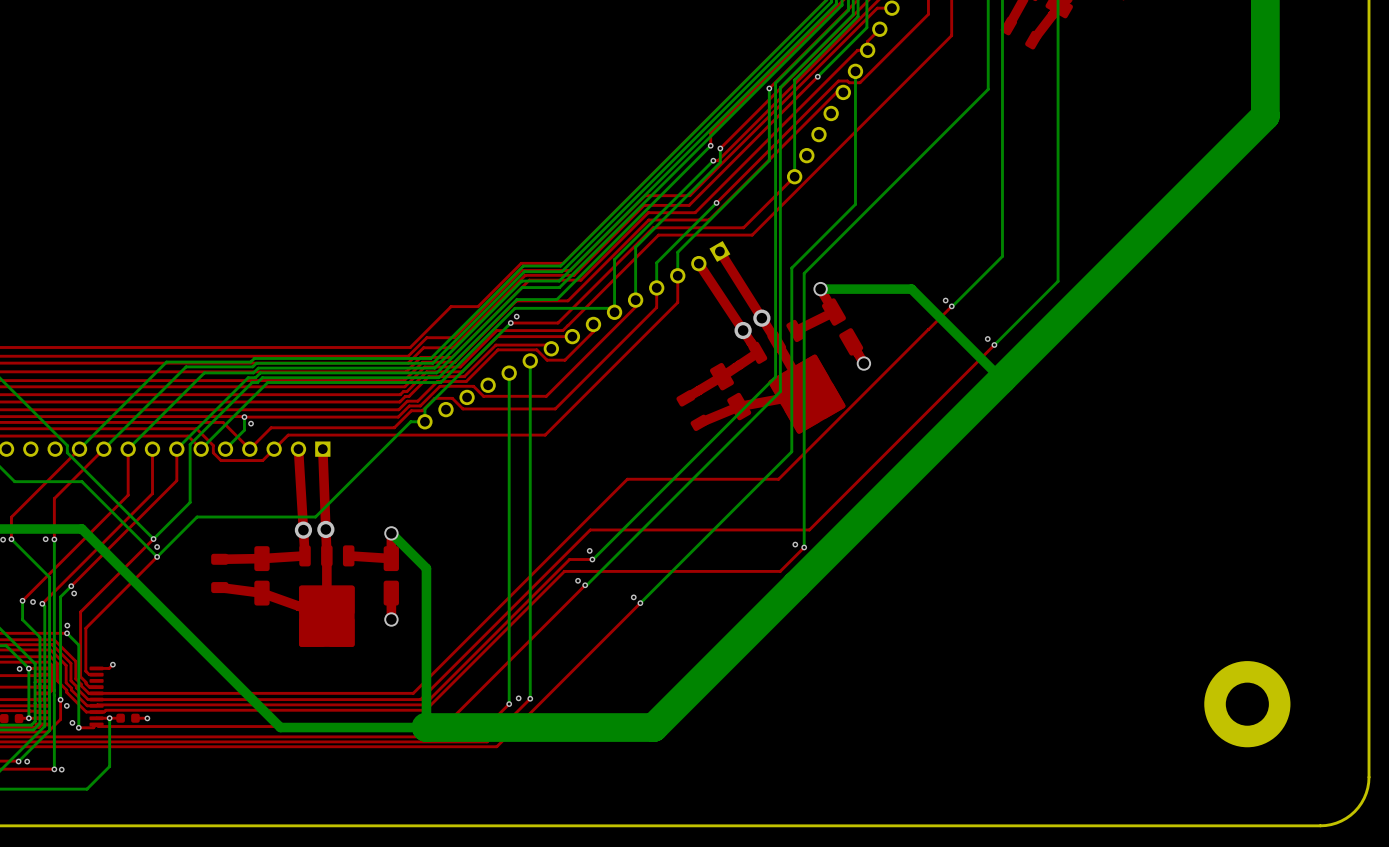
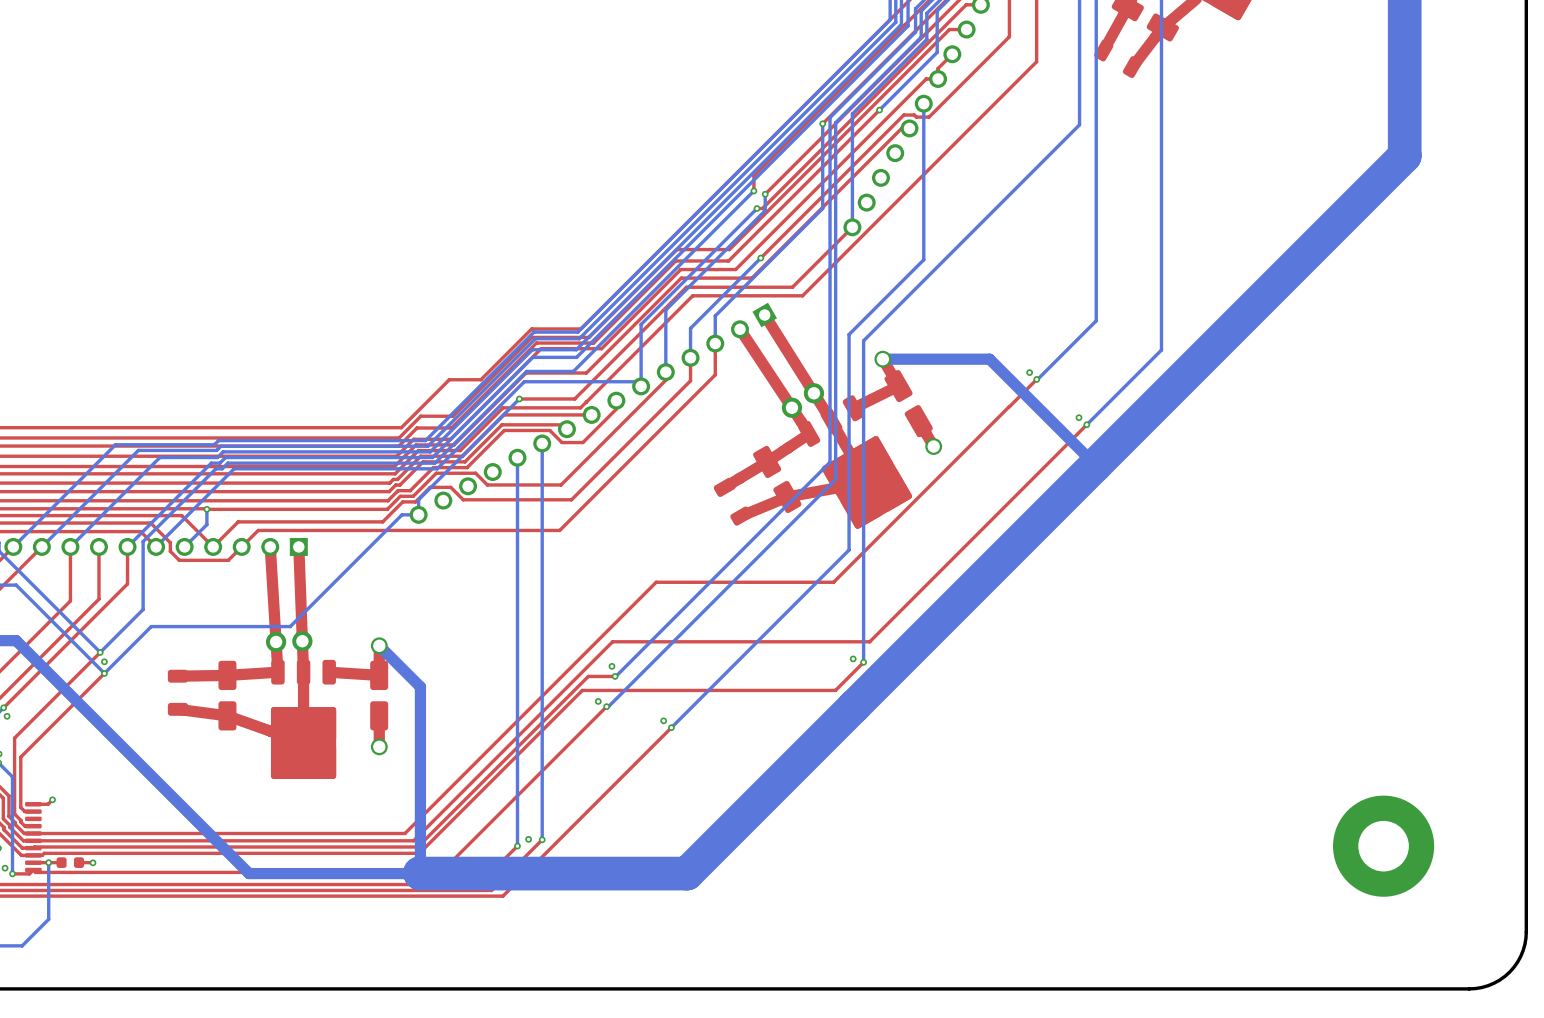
via: (516, 316) -> none
via: (251, 423) -> none

